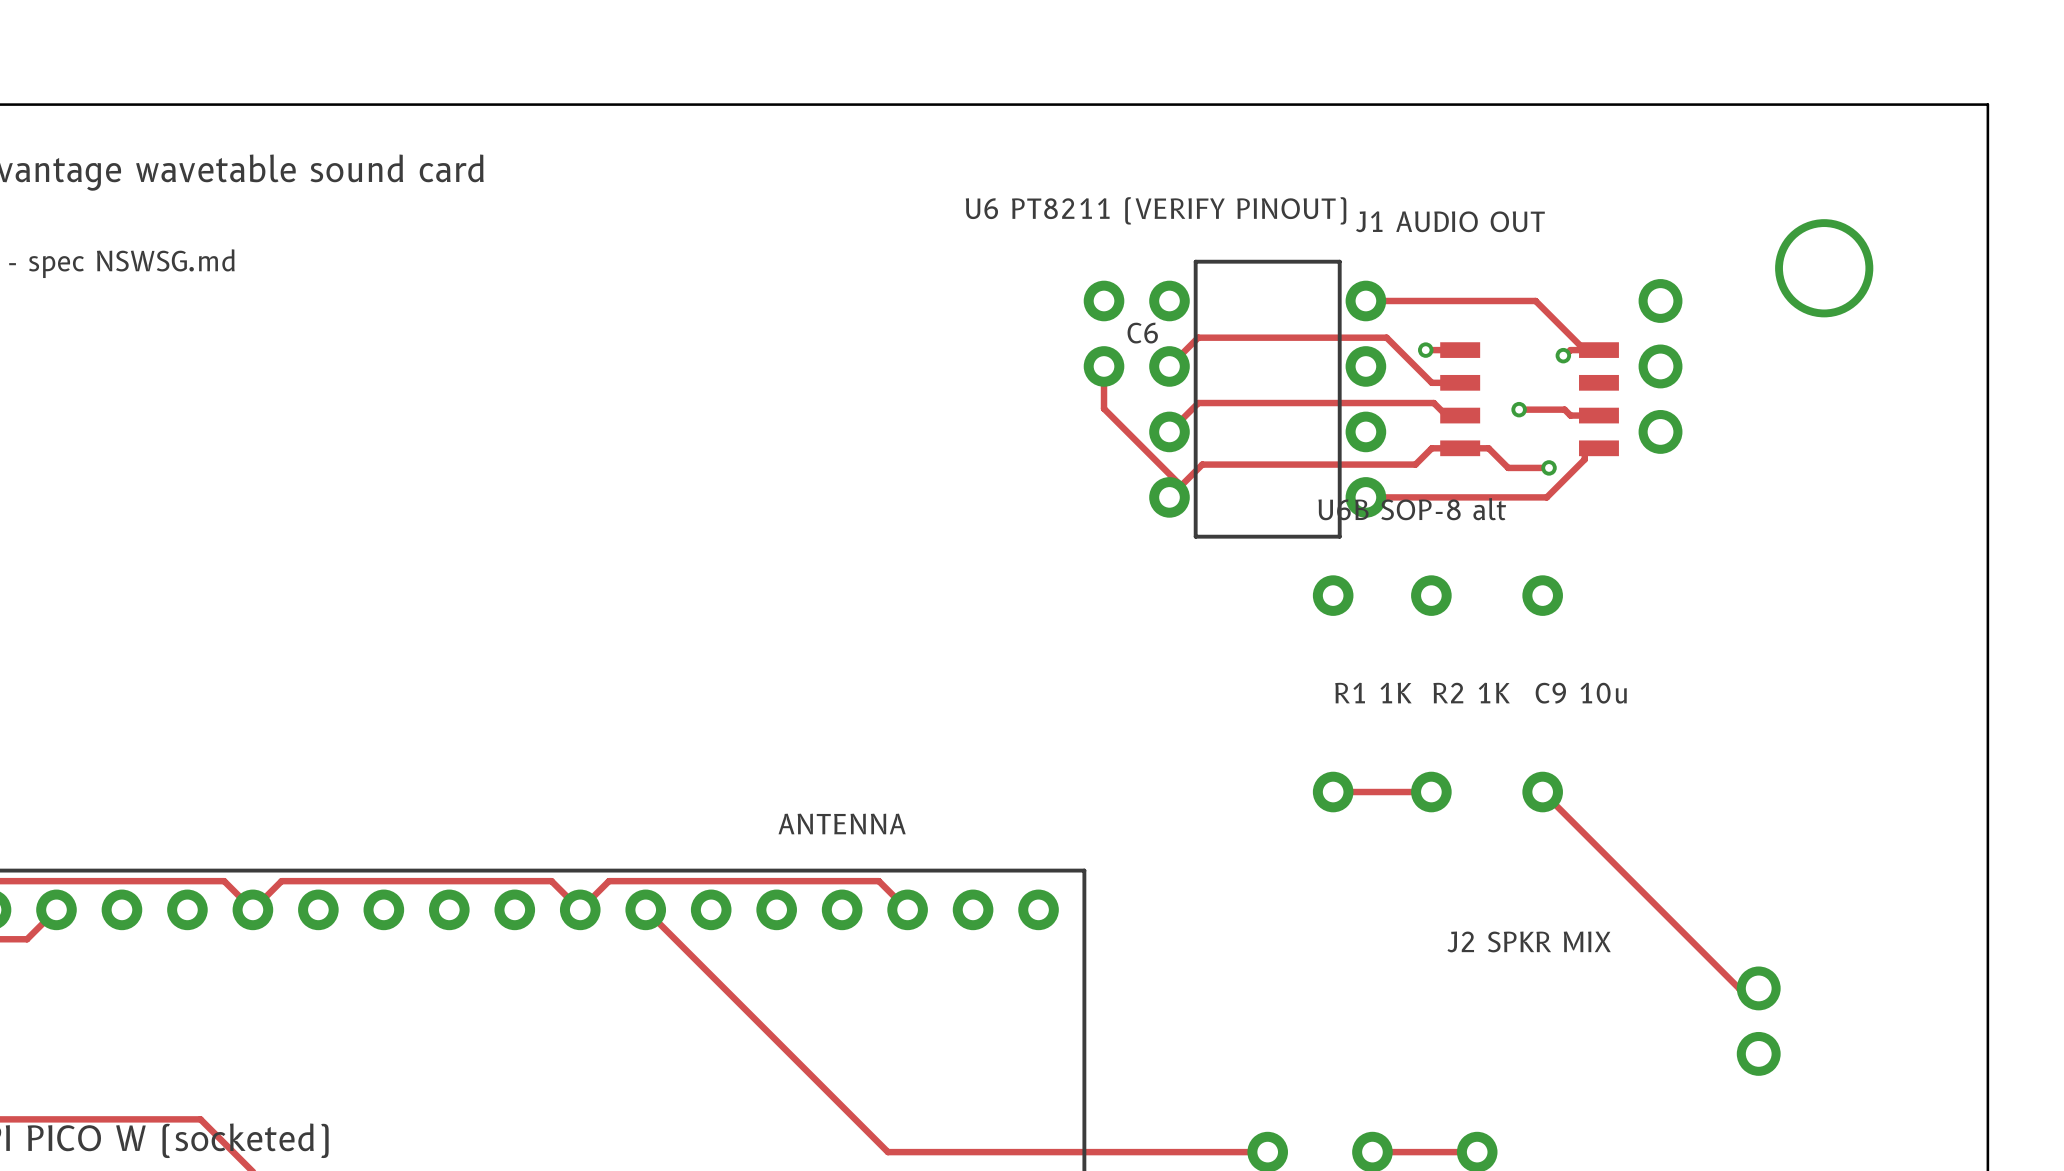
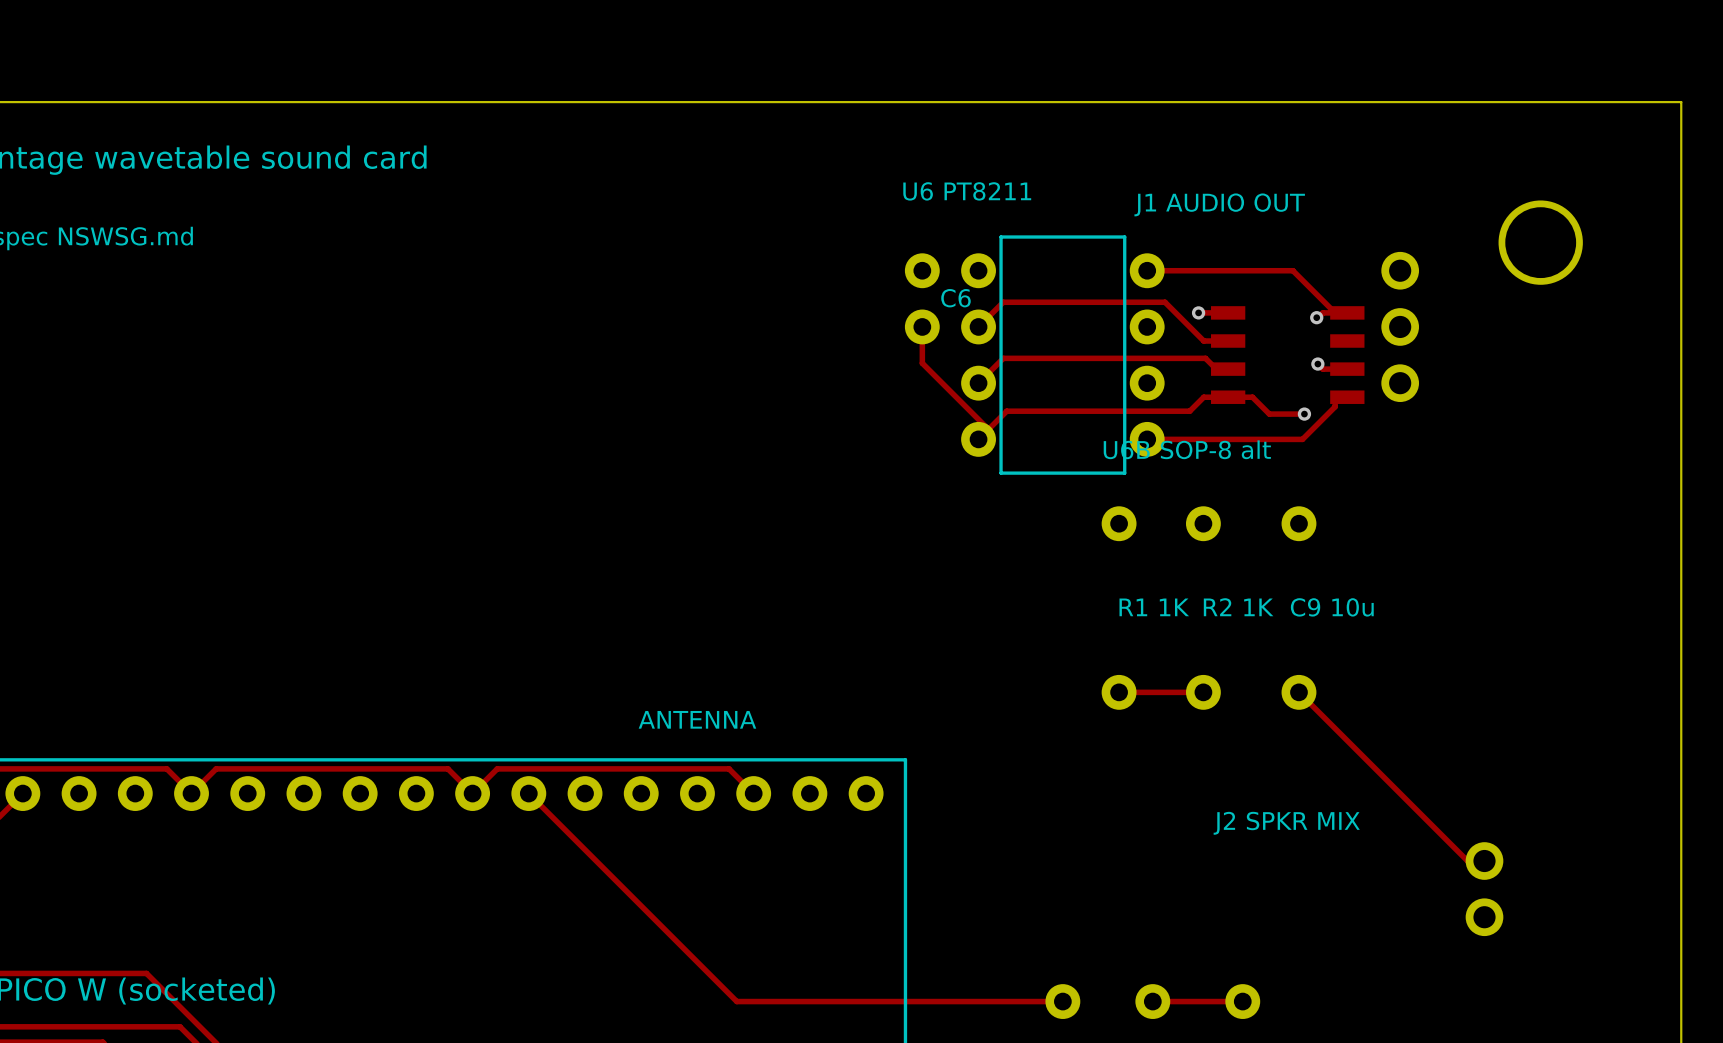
text: U6 PT8211 (VERIFY PINOUT) (1156, 210) -> U6 PT8211 (967, 191)
track: (1519, 409) (1564, 409) -> none
via position: (1519, 409) -> (1317, 364)

